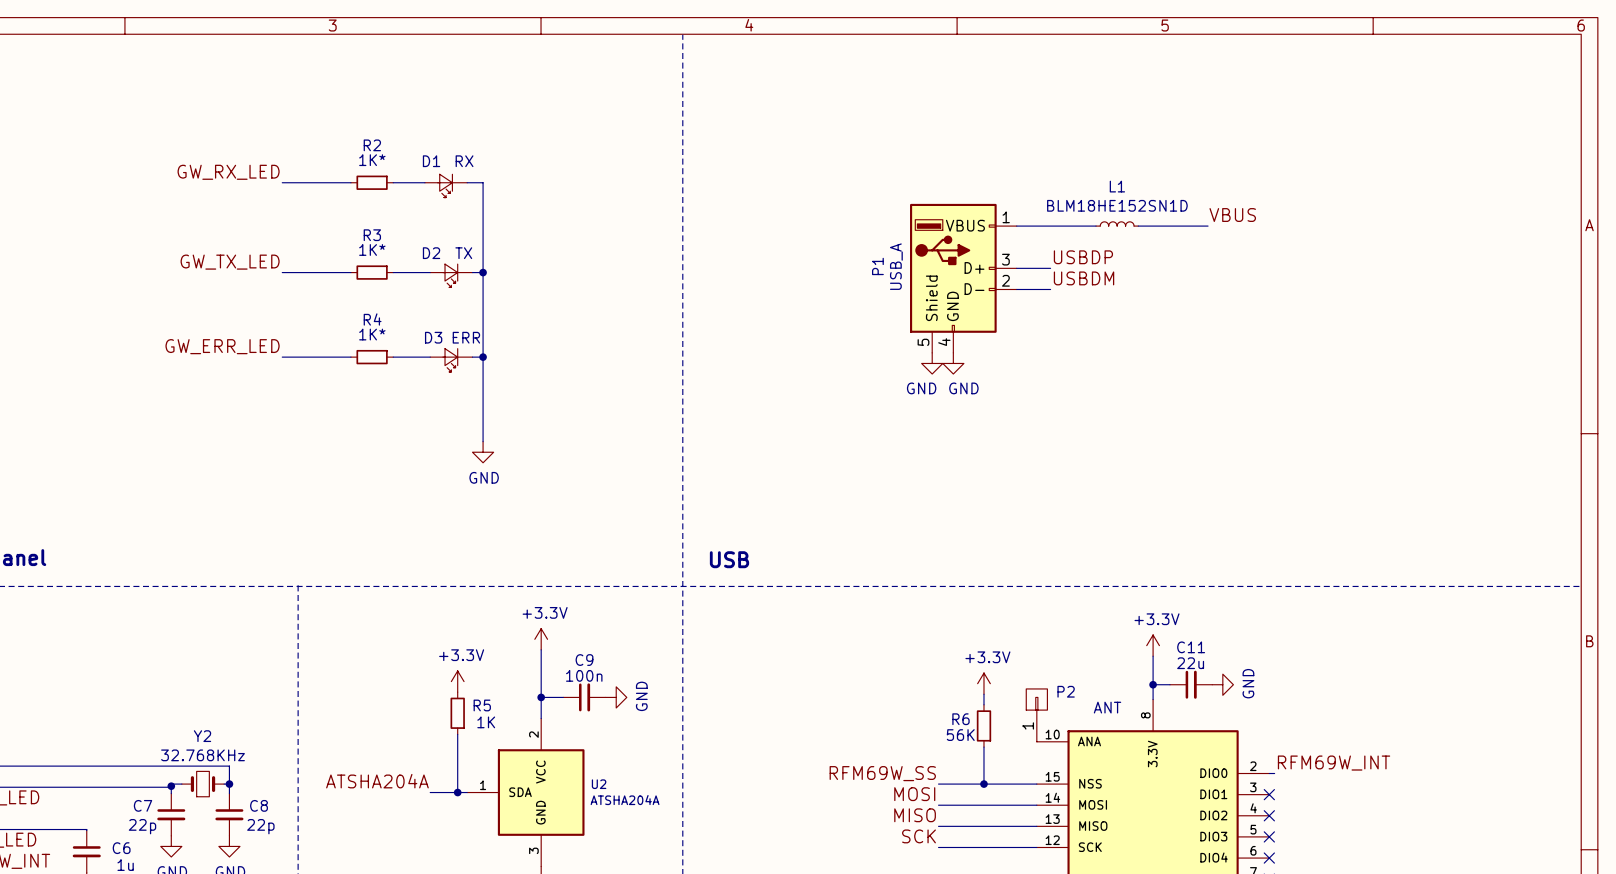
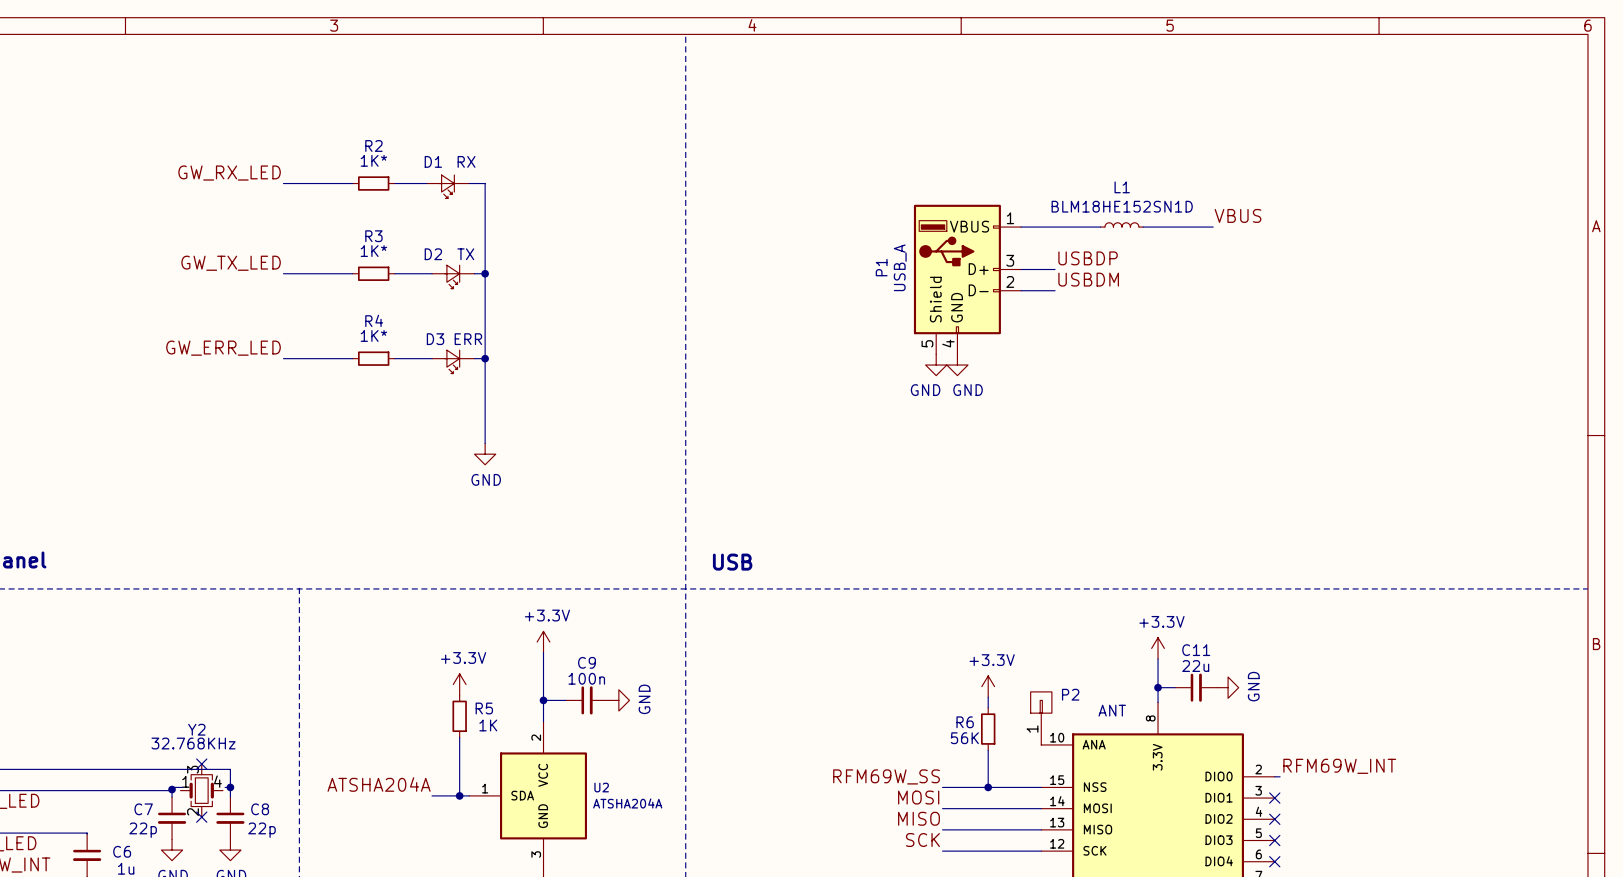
Y2 value position: 32.768KHz (203, 755) -> 32.768KHz (193, 743)
no-connect mark: none -> (201, 764)
Y2 symbol: [181, 771, 225, 797] -> [180, 764, 223, 818]
no-connect mark: none -> (201, 817)

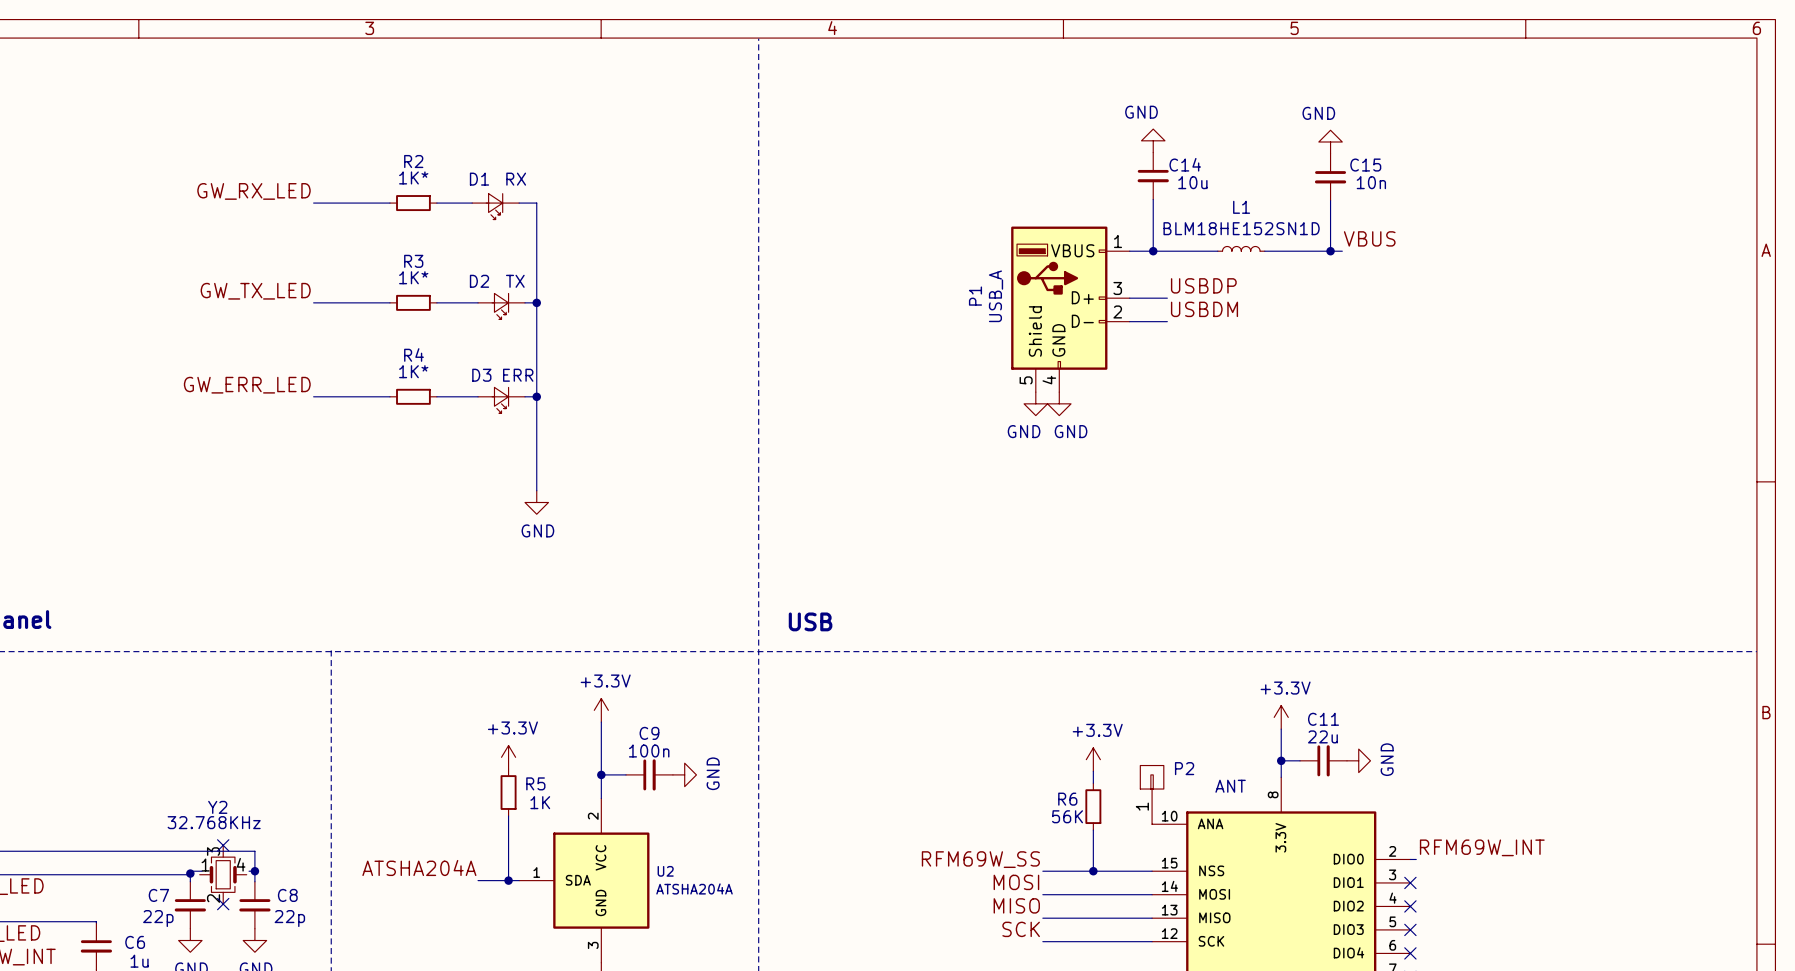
power symbol: none -> GND (1153, 140)
power symbol: none -> GND (1330, 141)
C14: none -> 10u (1153, 176)
C15: none -> 10n (1330, 177)
wire: none -> (1153, 199) (1153, 251)
wire: none -> (1330, 200) (1330, 251)
junction: none -> (1153, 251)
junction: none -> (1330, 251)

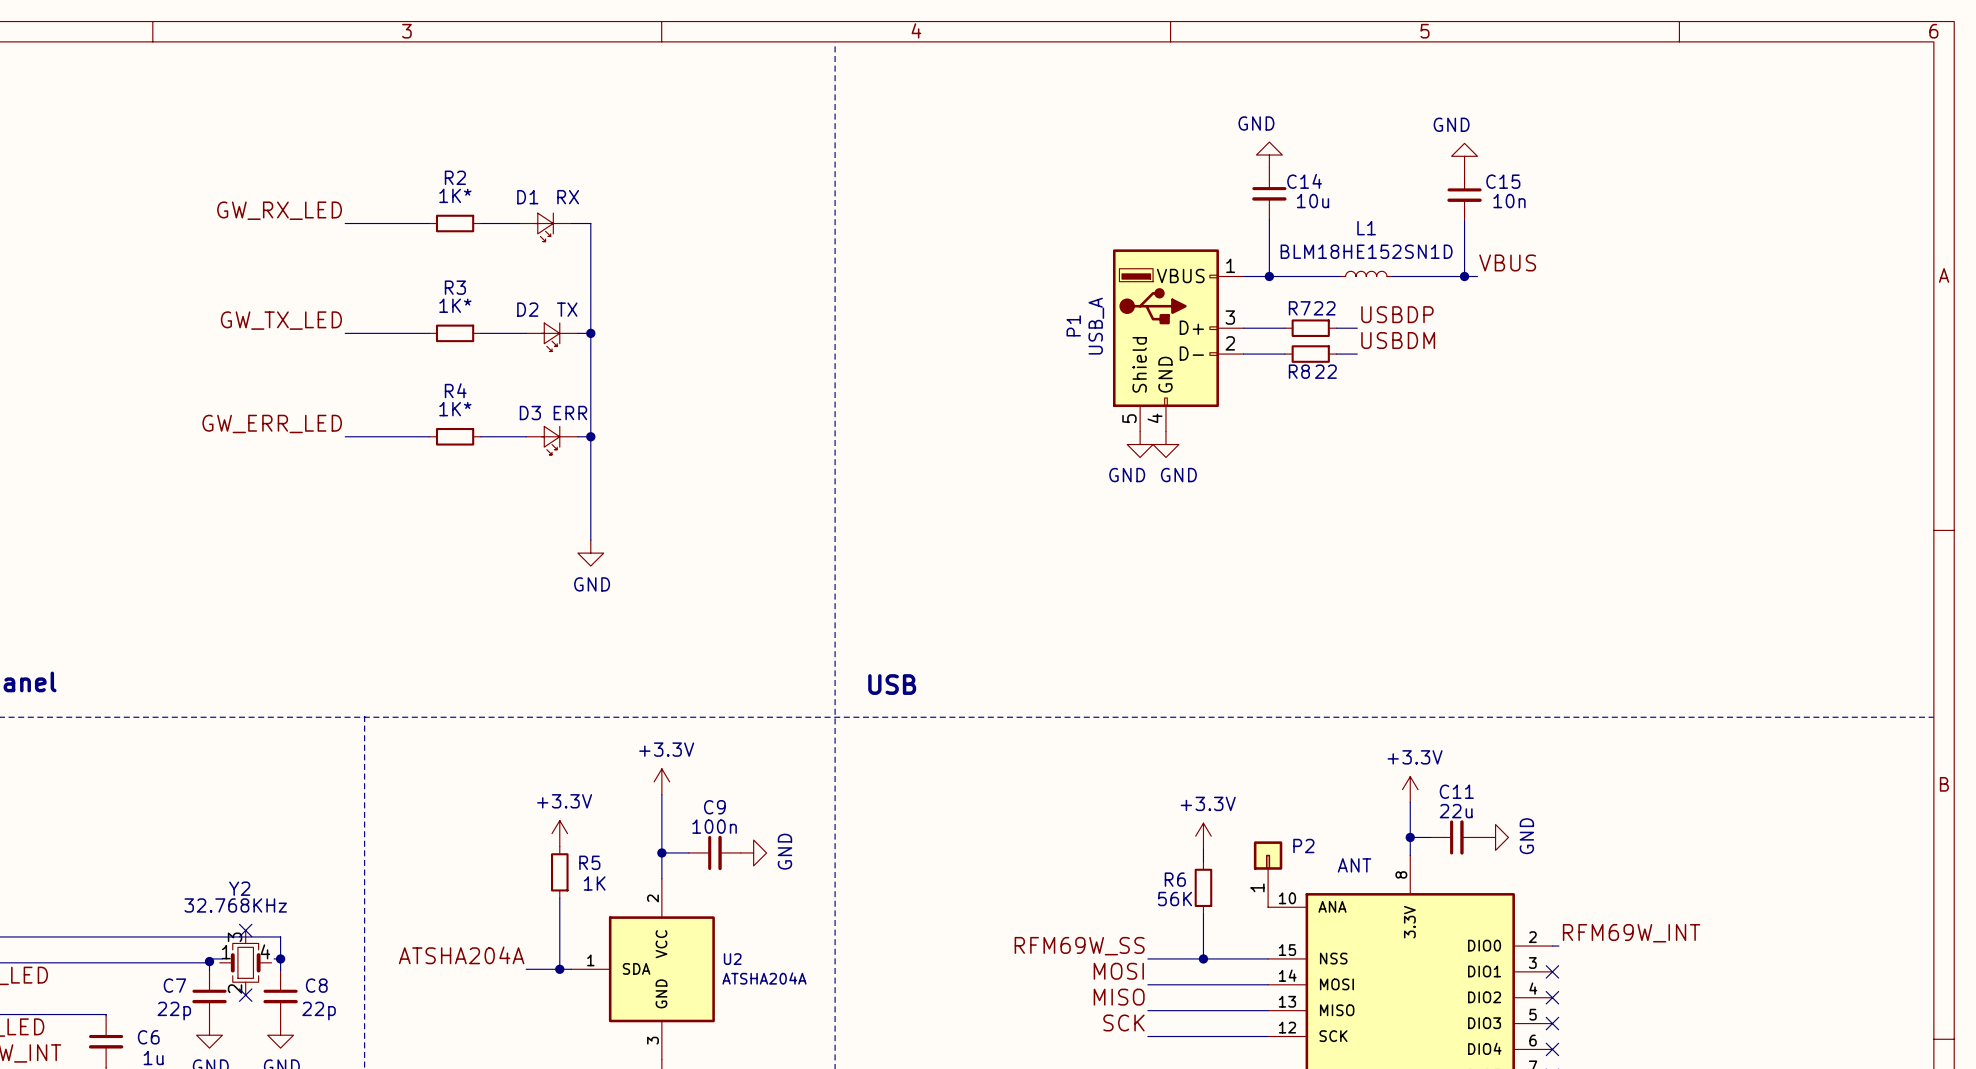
label position: USBDP (1203, 285) -> USBDP (1397, 314)
R7: none -> 22 (1310, 328)
wire: none -> (1336, 328) (1357, 328)
label position: USBDM (1204, 309) -> USBDM (1398, 340)
R8: none -> 22 (1310, 354)
wire: none -> (1336, 354) (1357, 354)
P2 symbol: [1140, 765, 1164, 825] -> [1253, 841, 1283, 908]

